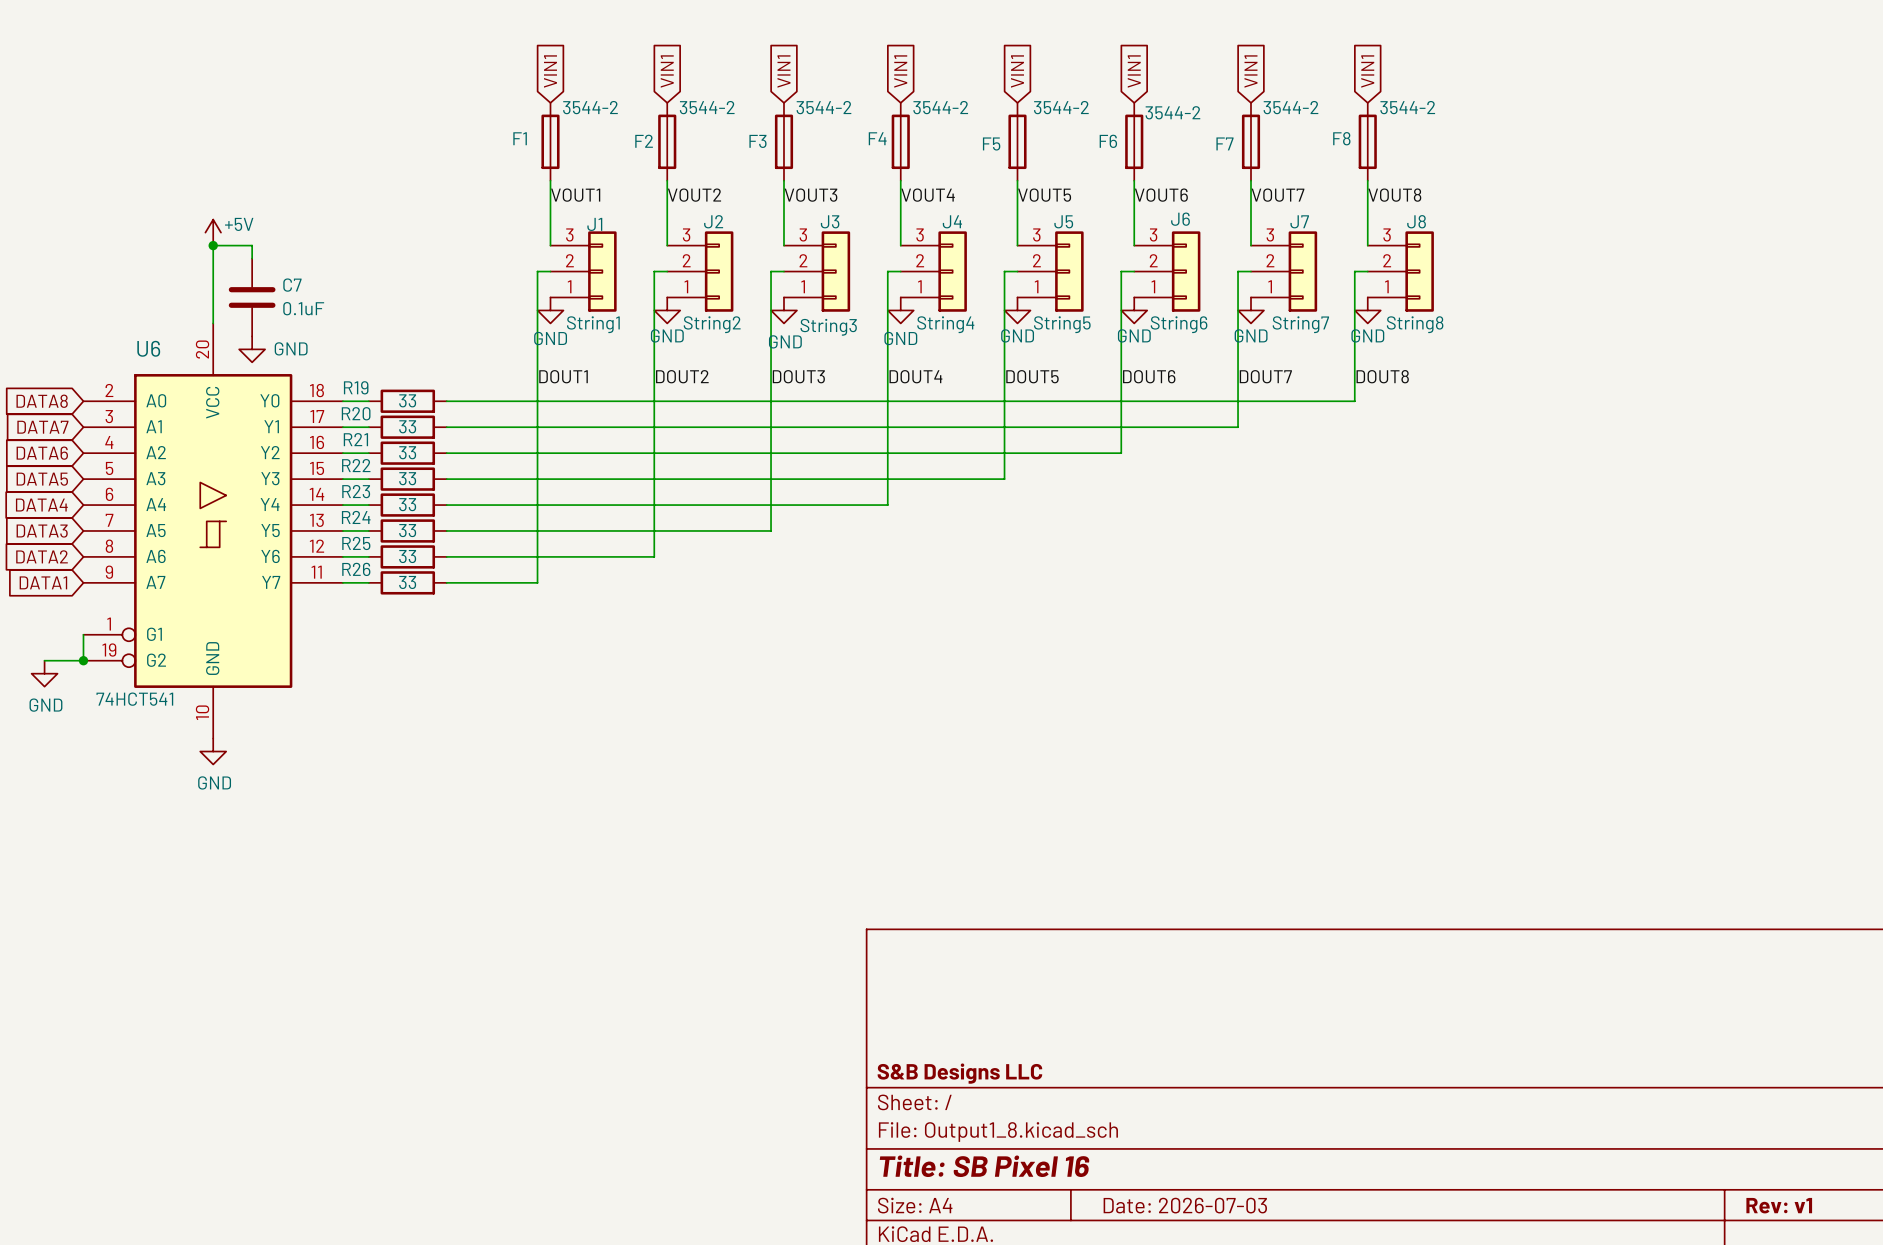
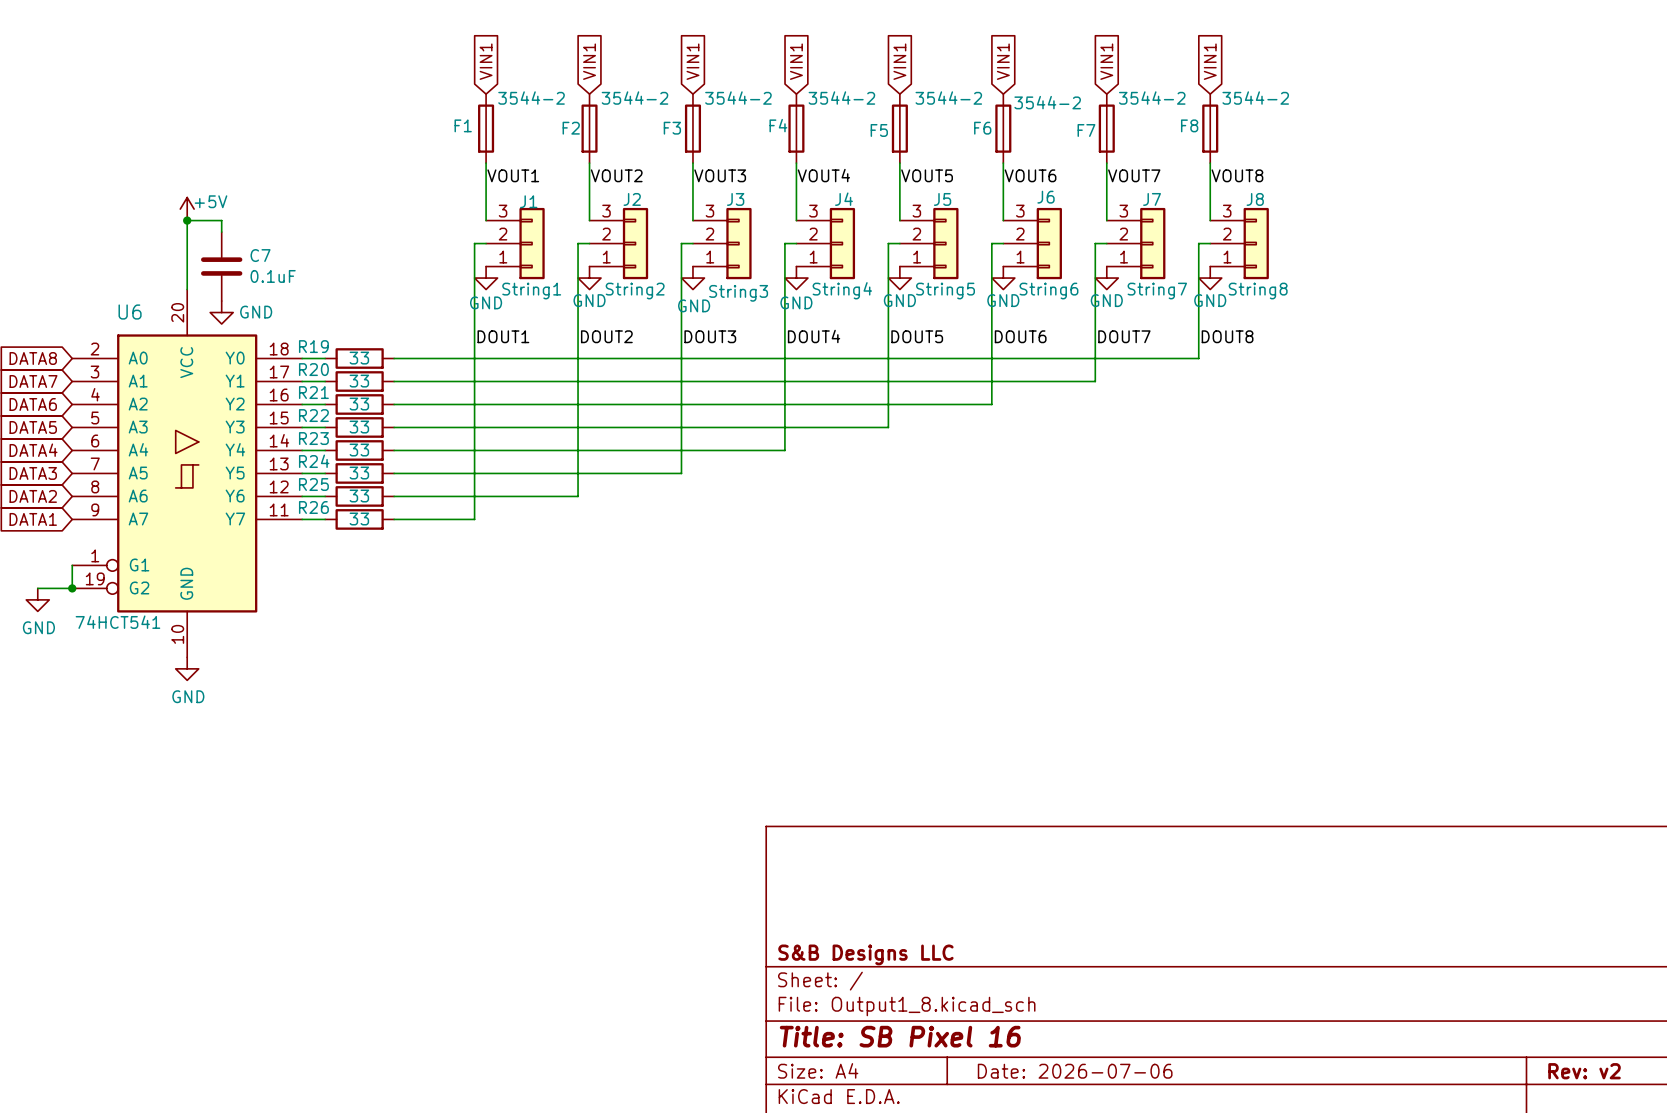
title block: Date: 2026-07-03 (1185, 1205) -> Date: 2026-07-06 (1075, 1071)
title block: Rev: v1 (1779, 1205) -> Rev: v2 (1584, 1071)

